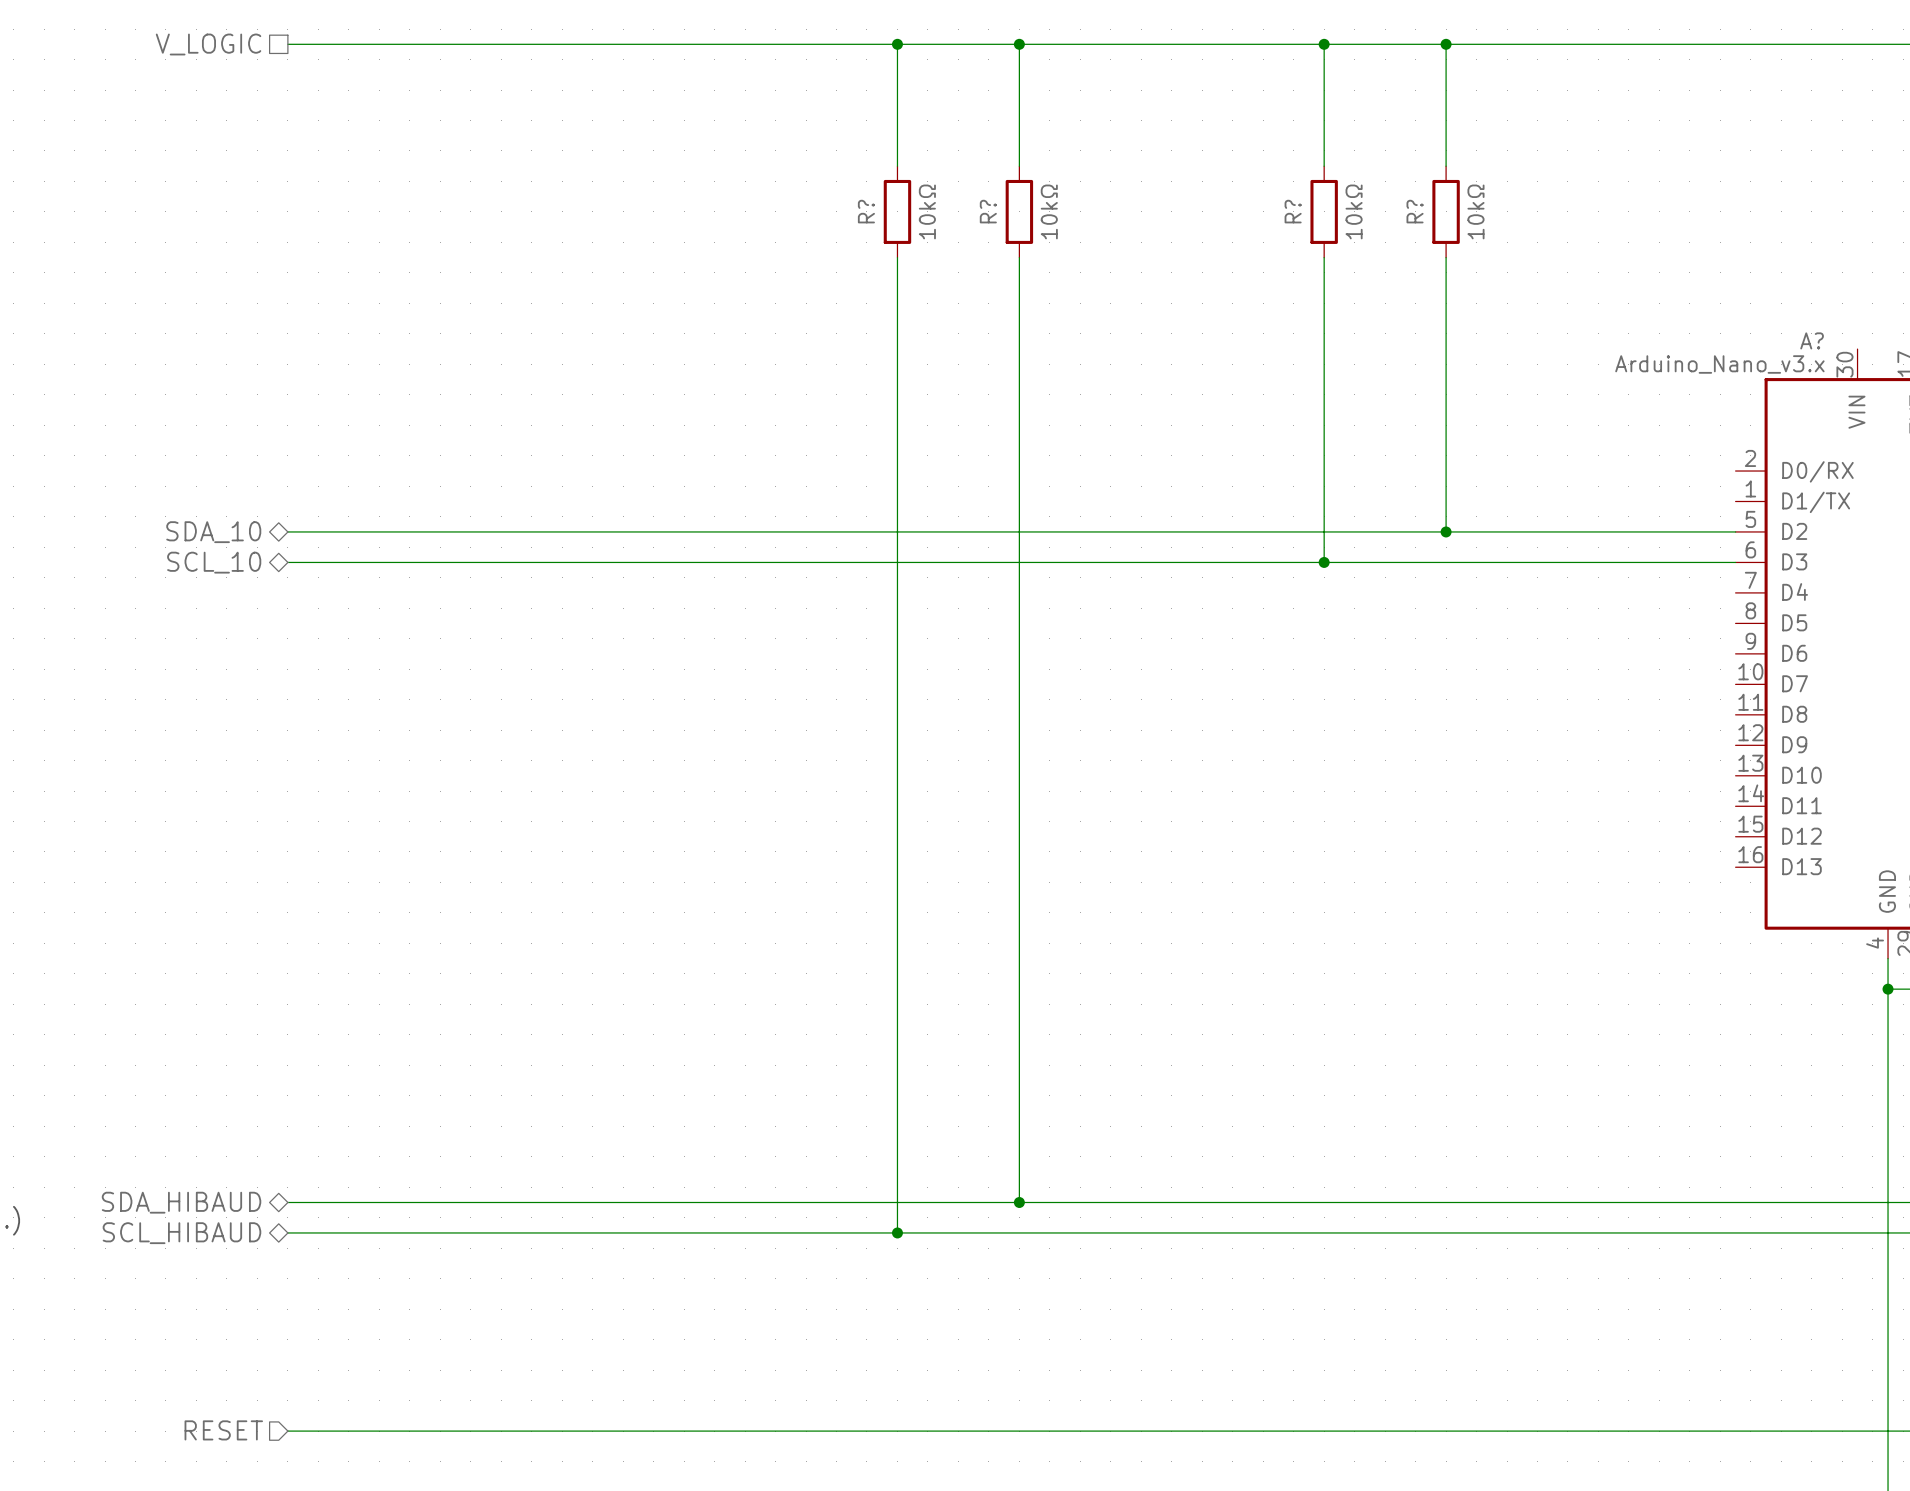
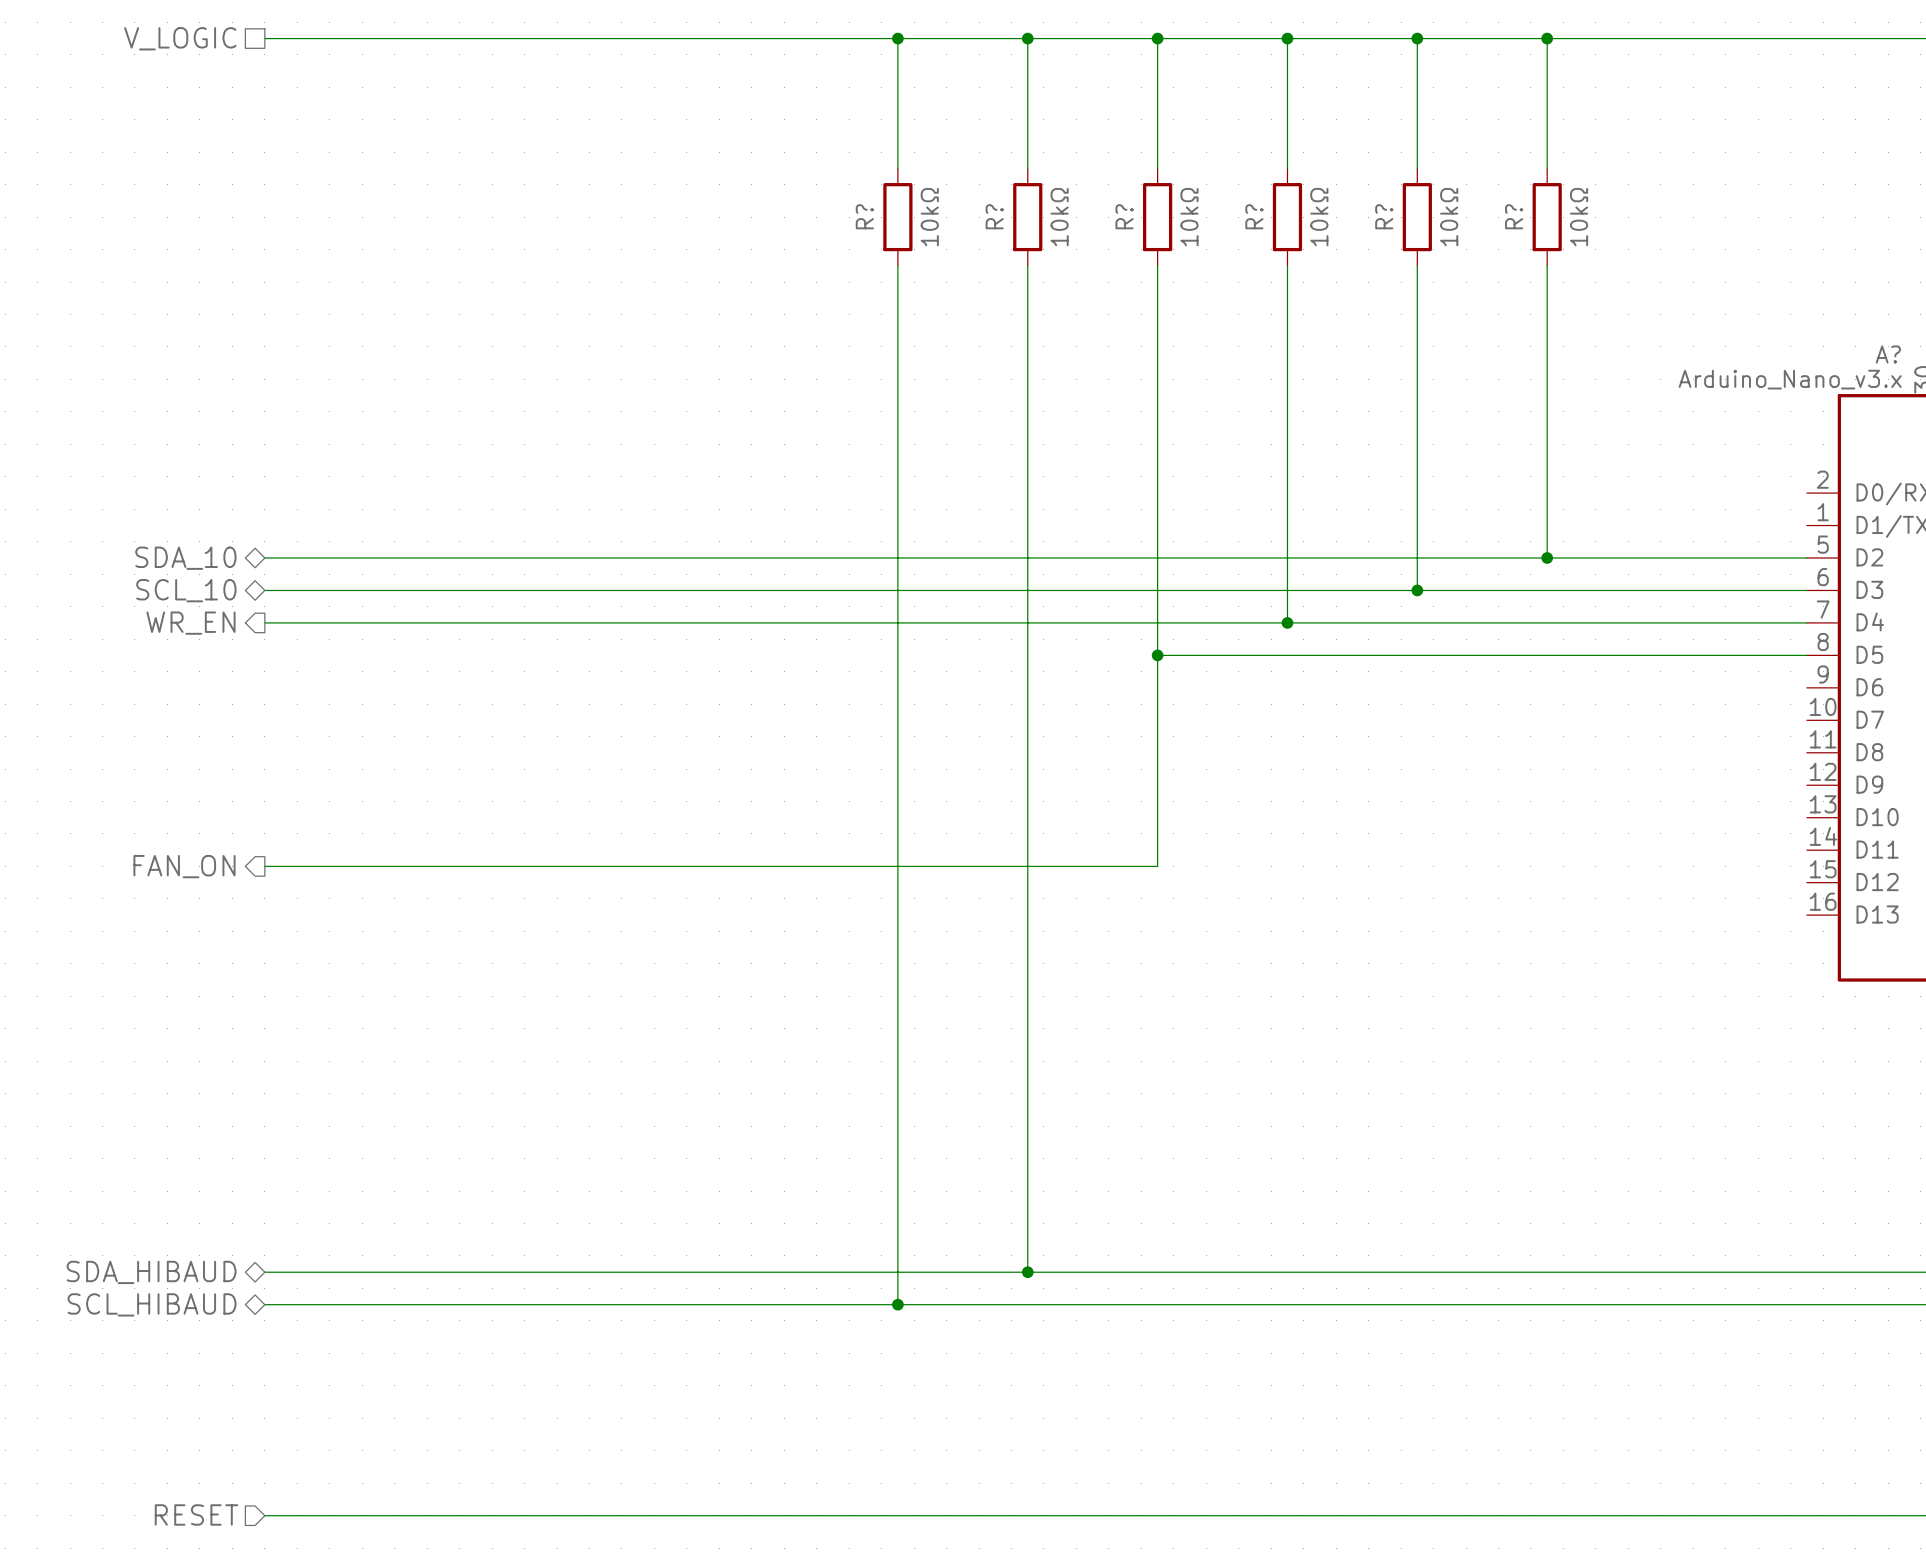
wire: (897, 44) (897, 166) -> (897, 38) (897, 168)
junction position: (897, 44) -> (897, 38)
wire: (1019, 44) (1019, 166) -> (1027, 38) (1027, 168)
junction position: (1019, 44) -> (1027, 38)
wire: none -> (1157, 38) (1157, 168)
junction: none -> (1157, 38)
wire: none -> (1287, 38) (1287, 168)
junction: none -> (1287, 38)
wire: (1324, 44) (1324, 166) -> (1417, 38) (1417, 168)
junction: (1324, 44) -> none
junction: none -> (1417, 38)
wire: (1446, 44) (1446, 166) -> (1547, 38) (1547, 168)
junction: (1446, 44) -> none
junction: none -> (1547, 38)
R? position: (897, 211) -> (897, 217)
R? position: (1019, 211) -> (1027, 217)
R?: none -> 10kΩ (1157, 217)
R?: none -> 10kΩ (1287, 217)
R?: 10kΩ (1324, 211) -> none
R?: none -> 10kΩ (1417, 217)
R?: 10kΩ (1446, 211) -> none
R?: none -> 10kΩ (1547, 217)
wire: (897, 257) (897, 1232) -> (897, 265) (897, 1304)
wire: (1019, 257) (1019, 1202) -> (1027, 265) (1027, 1272)
wire: none -> (1157, 265) (1157, 866) (264, 866)
wire: none -> (1287, 265) (1287, 622)
wire: (1324, 257) (1324, 562) -> (1417, 265) (1417, 590)
wire: (1446, 257) (1446, 531) -> (1547, 265) (1547, 558)
junction: (1446, 531) -> none
junction: none -> (1547, 558)
junction: (1324, 562) -> none
junction: none -> (1417, 590)
wire: none -> (264, 622) (1806, 622)
junction: none -> (1287, 622)
hierarchical label: none -> WR_EN (190, 623)
wire: none -> (1157, 655) (1806, 655)
junction: none -> (1157, 655)
hierarchical label: none -> FAN_ON (184, 866)
junction position: (1019, 1202) -> (1027, 1272)
junction position: (897, 1232) -> (897, 1304)

